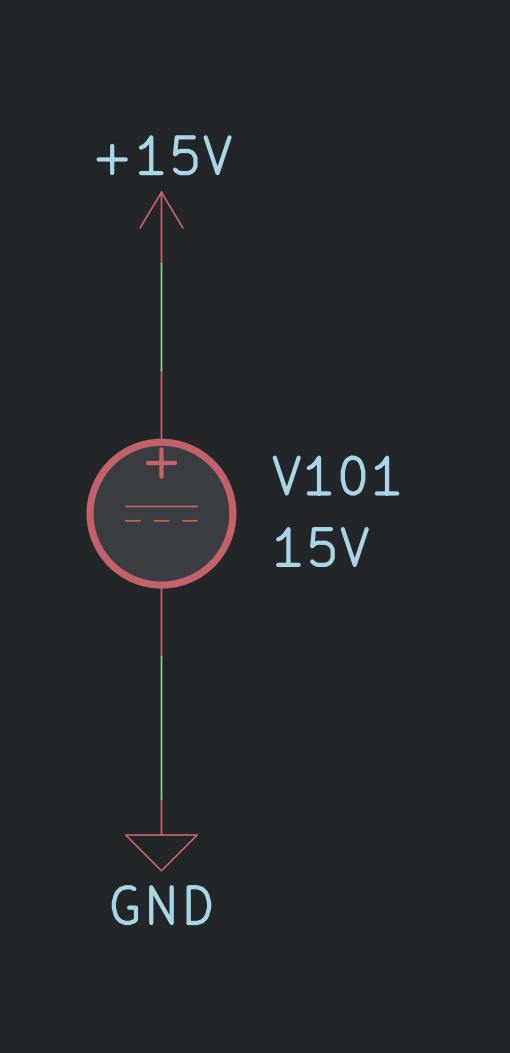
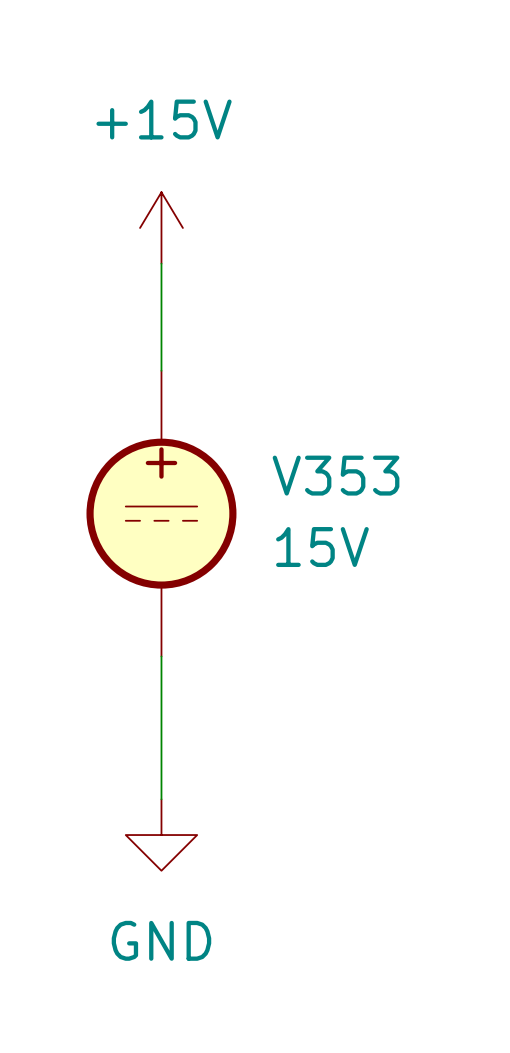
power symbol text position: +15V (164, 155) -> +15V (164, 119)
V101 name: V101 (336, 475) -> V353 (336, 475)
power symbol text position: GND (161, 905) -> GND (161, 940)

